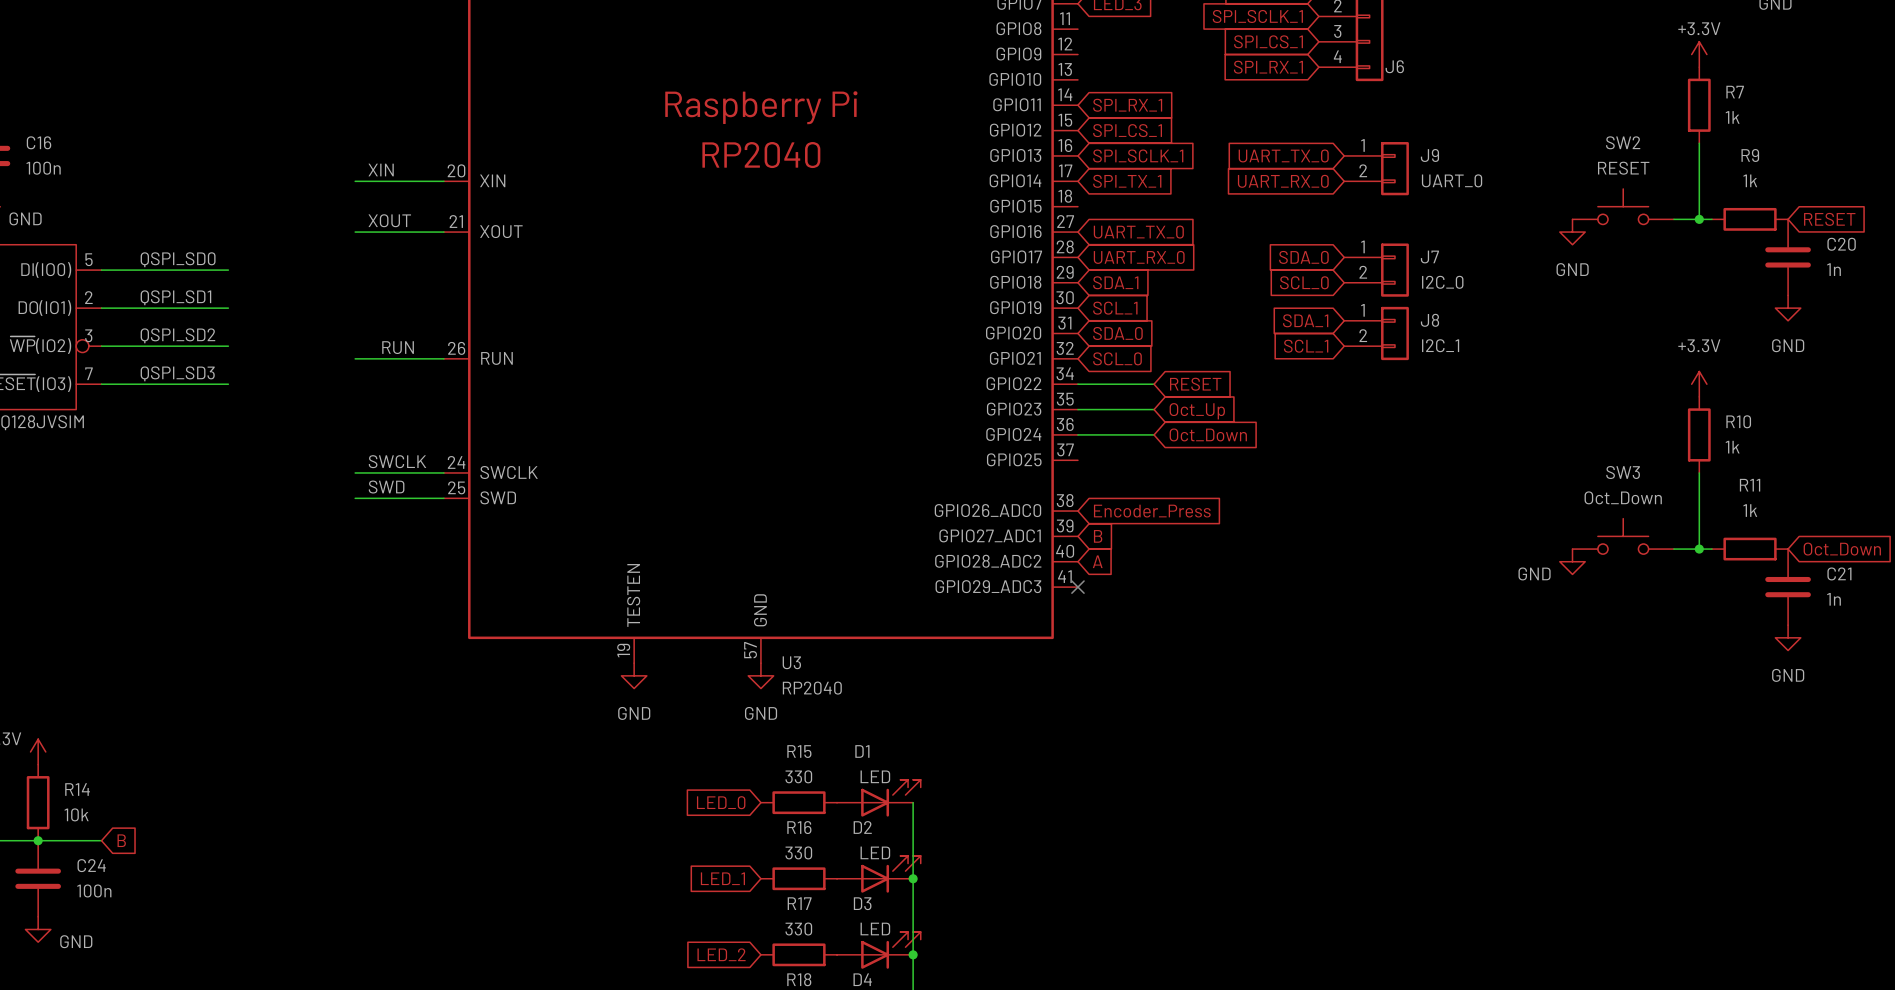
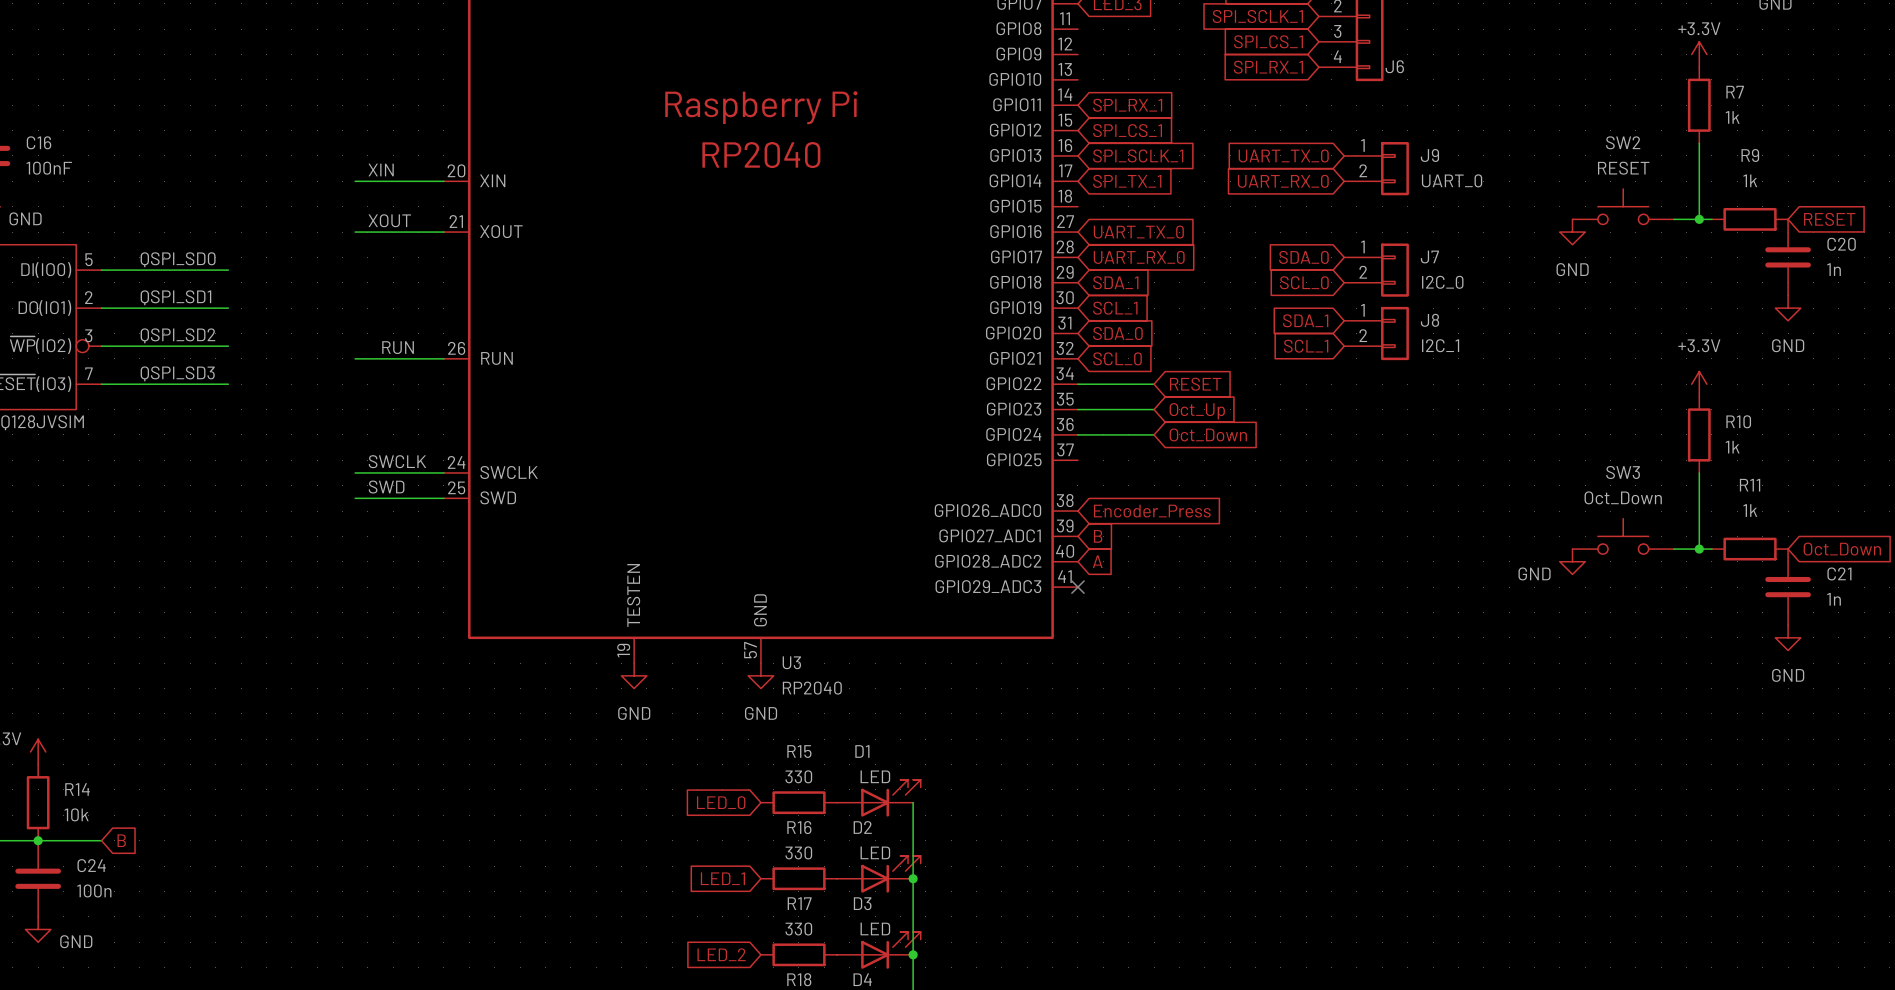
C16 value: 100n (43, 168) -> 100nF (49, 168)

